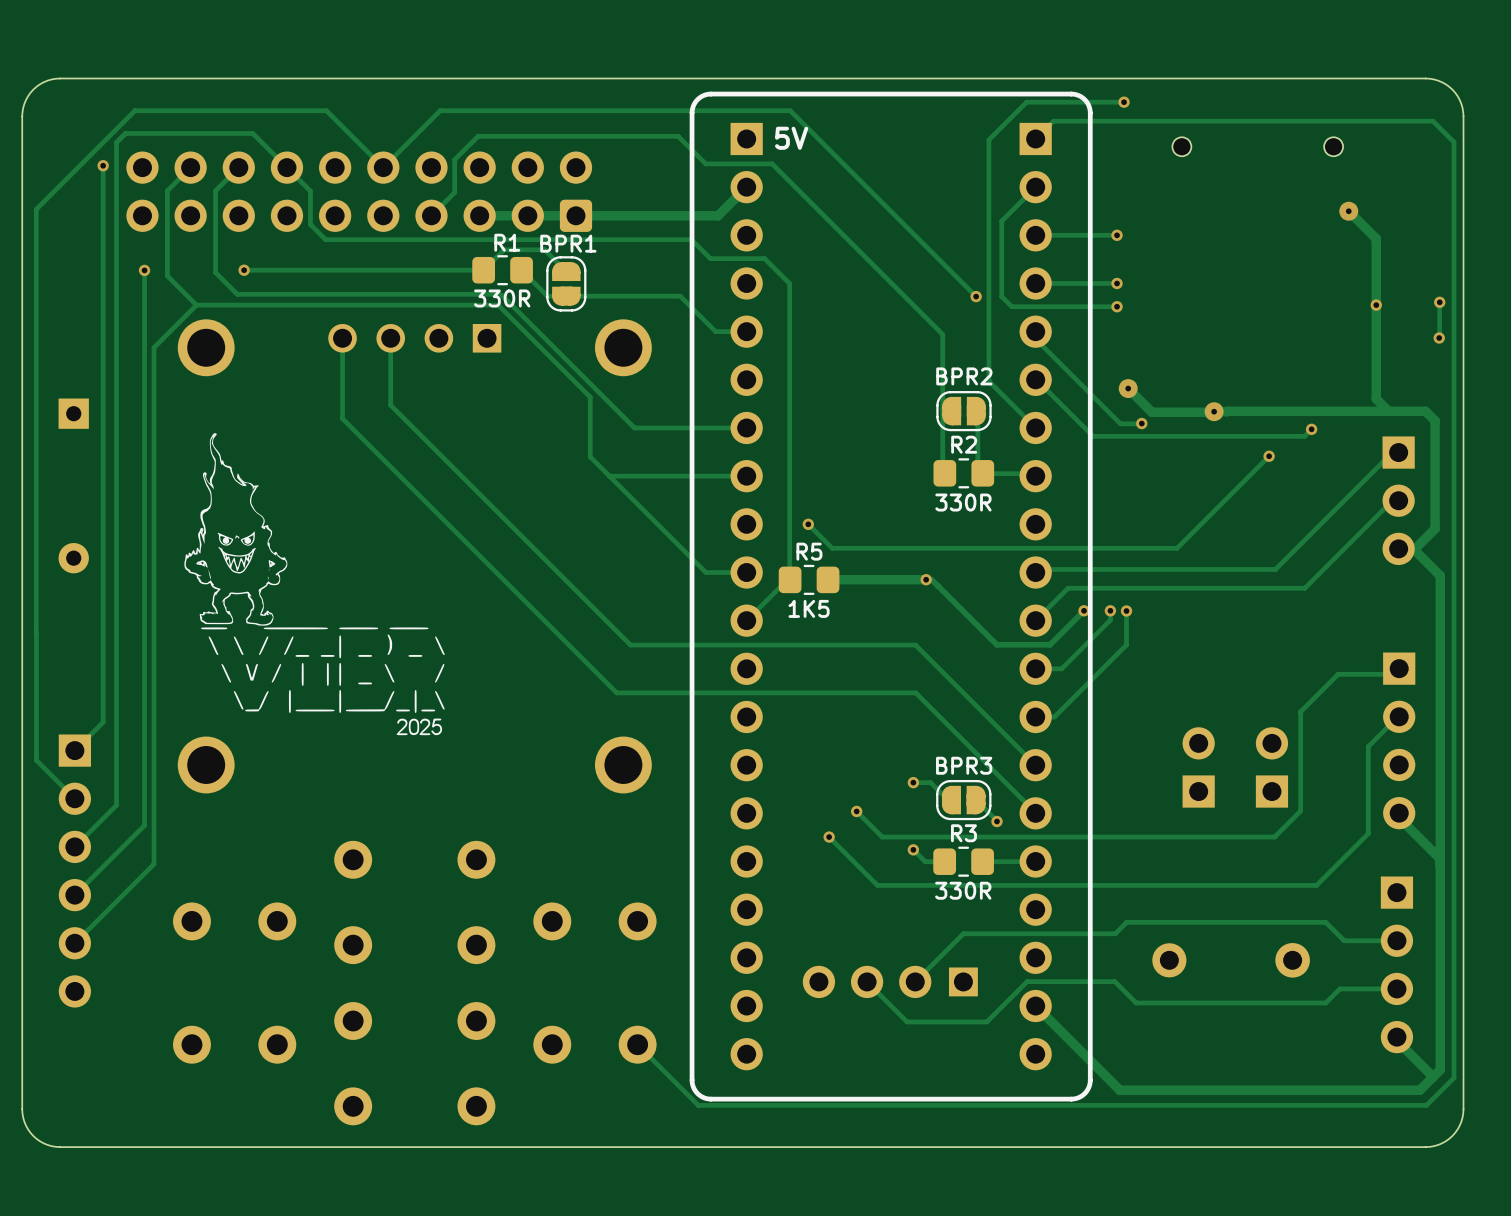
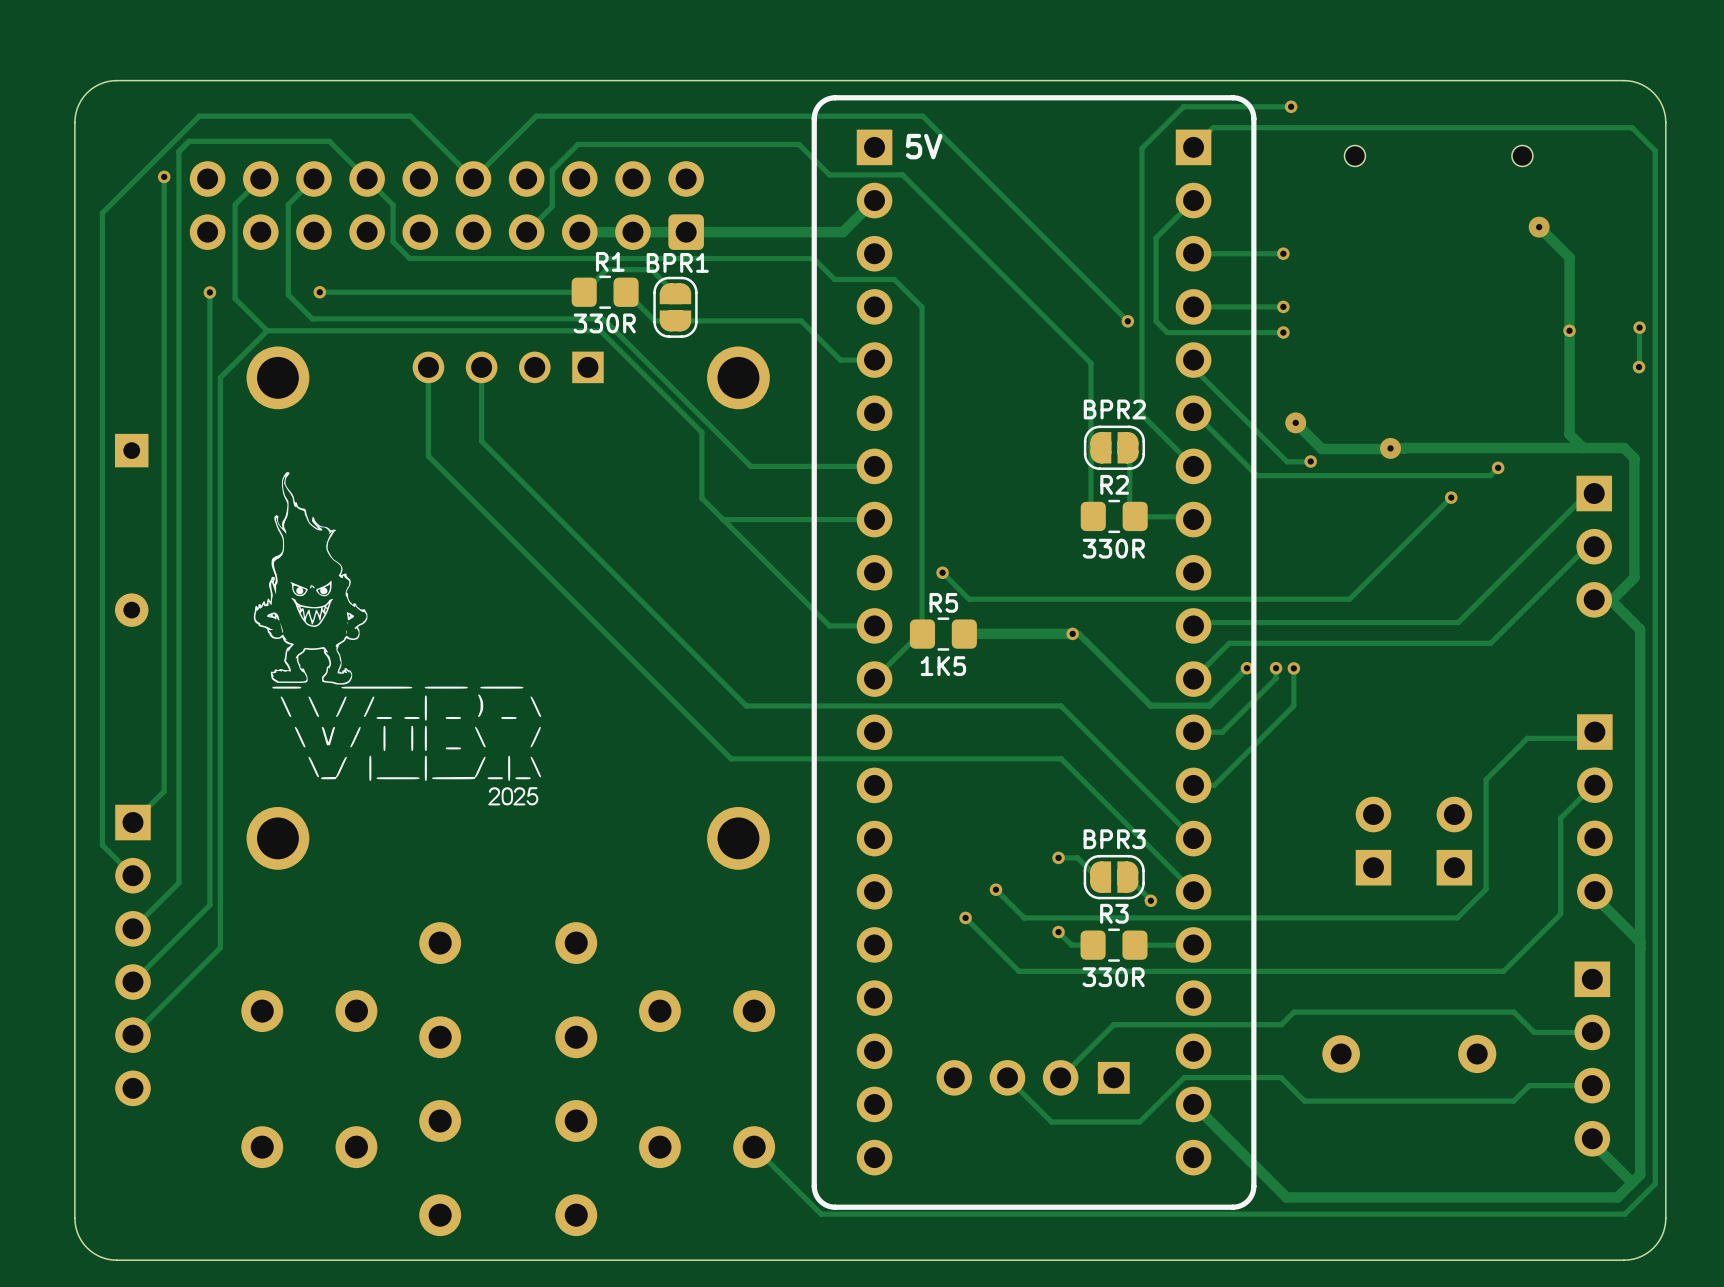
track: (47, 198) (36, 209) (36, 632) -> (102, 213) (102, 845)
track: (36, 632) (36, 760) (47, 771) -> none

